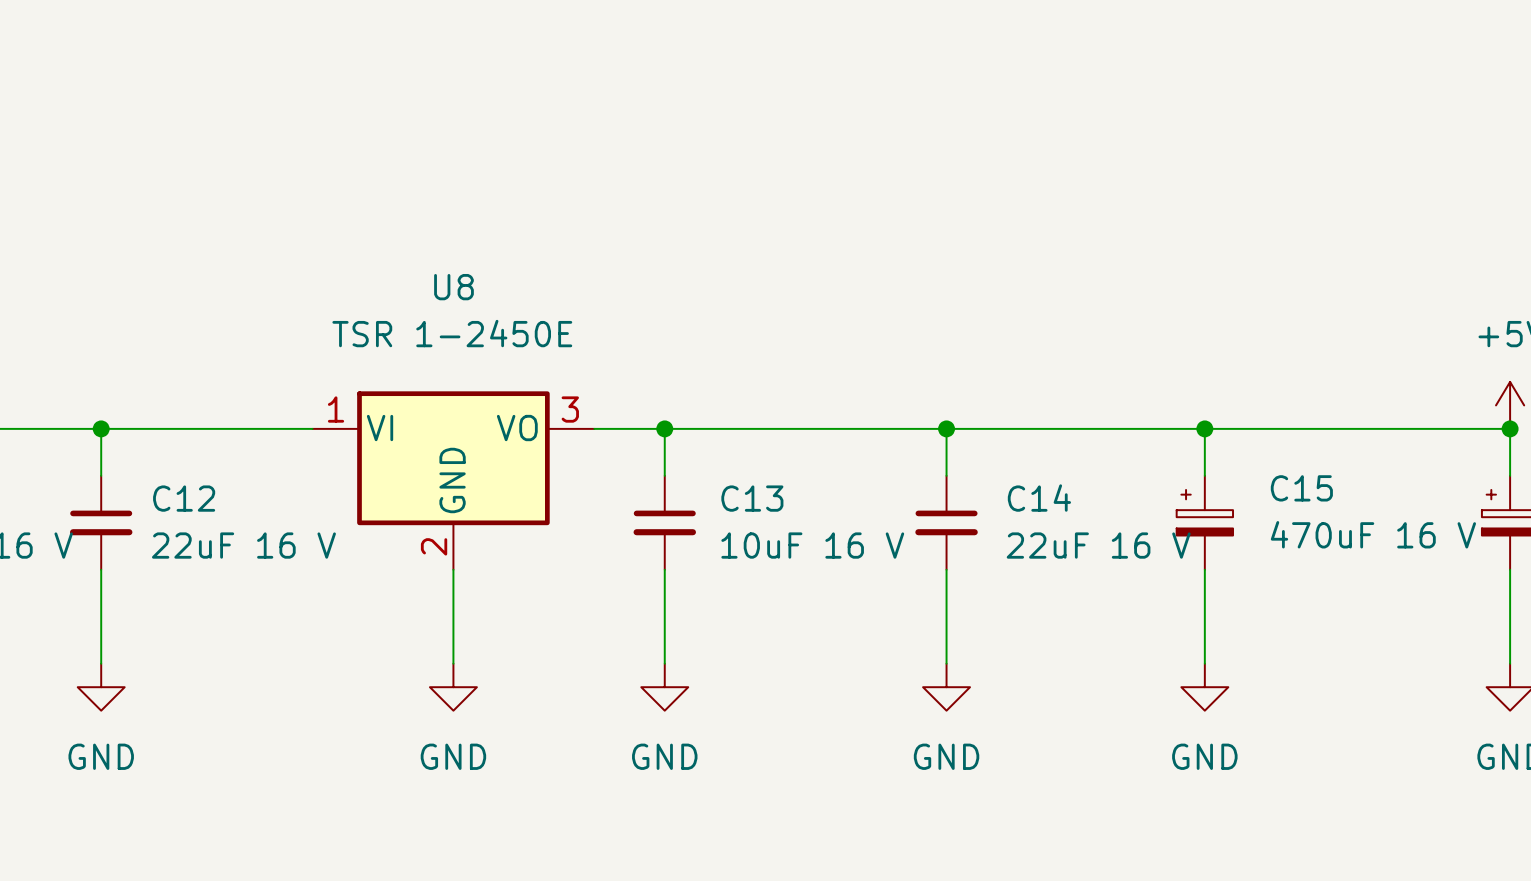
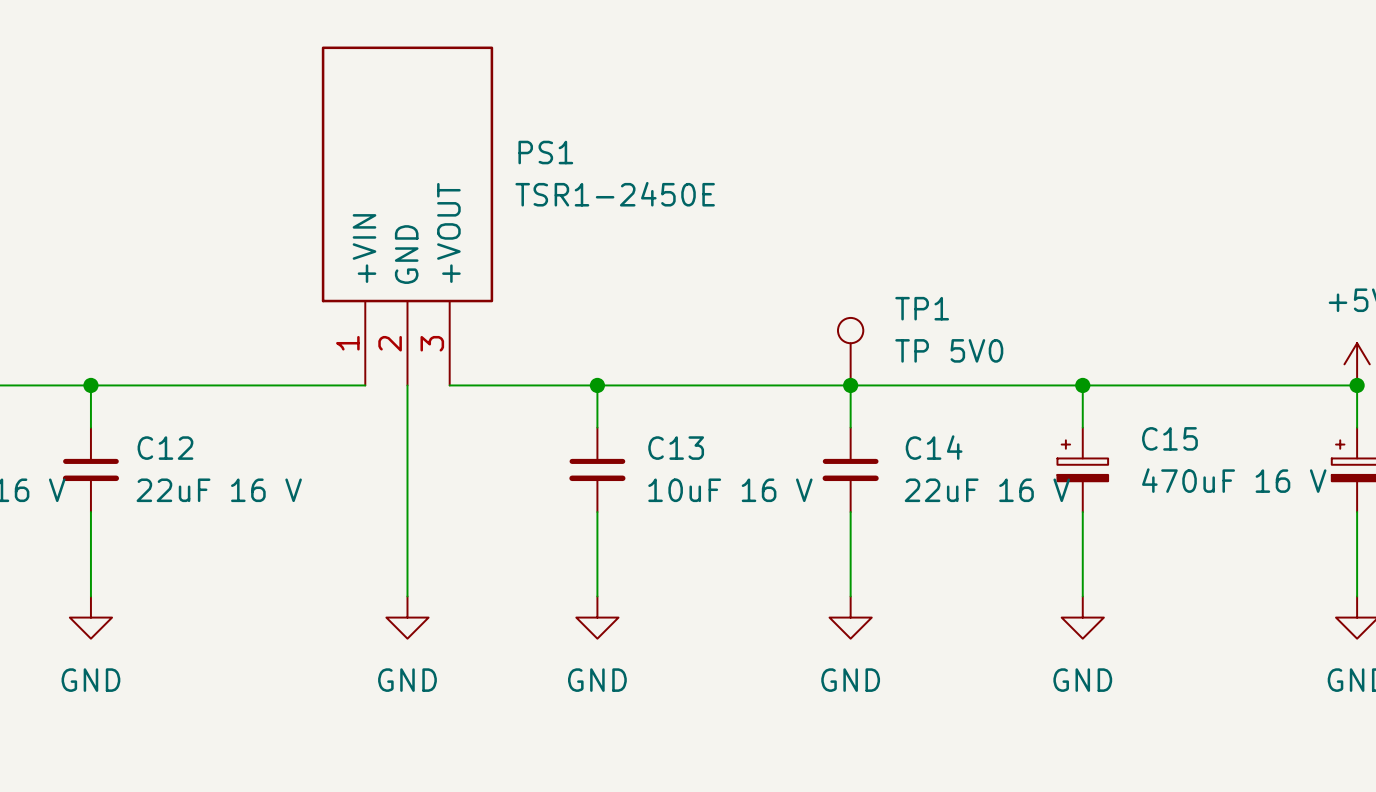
PS1: none -> TSR1-2450E (407, 215)
TP1: none -> TP 5V0 (850, 351)
U8: TSR 1-2450E (453, 480) -> none

